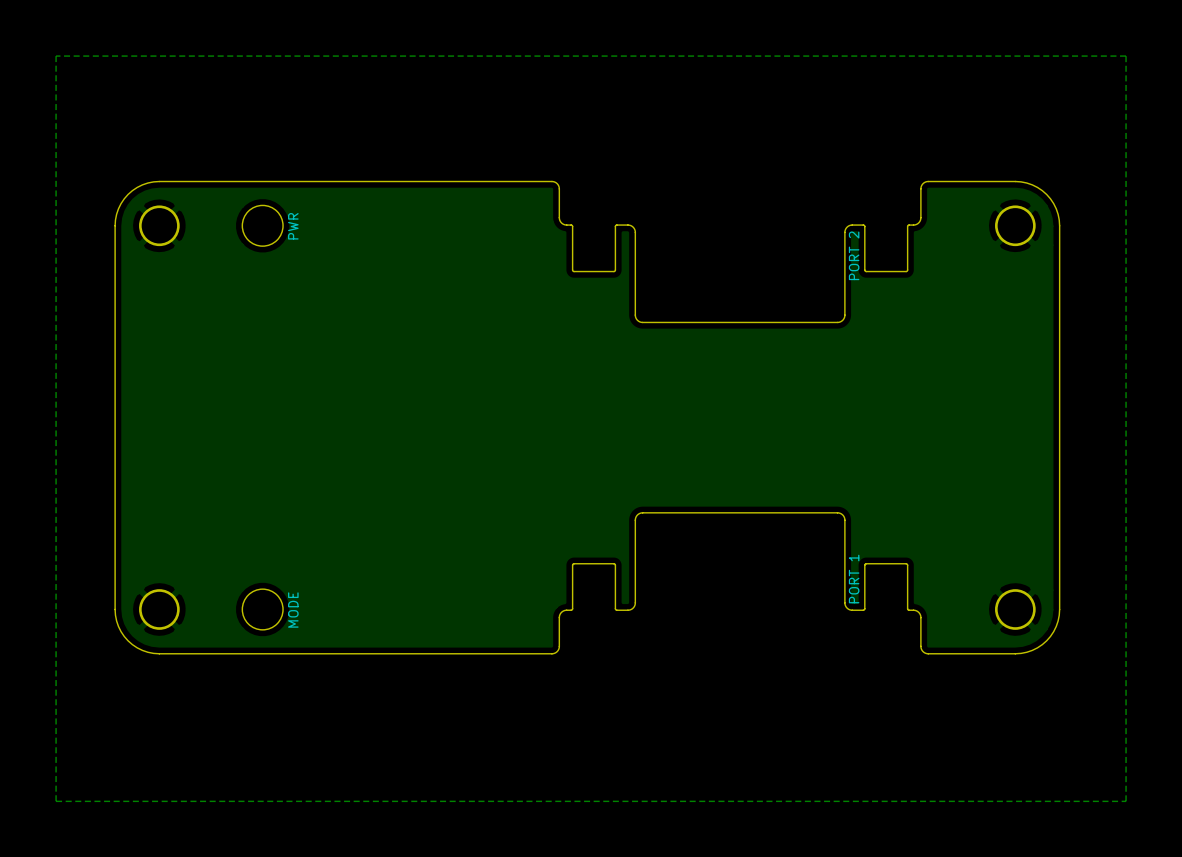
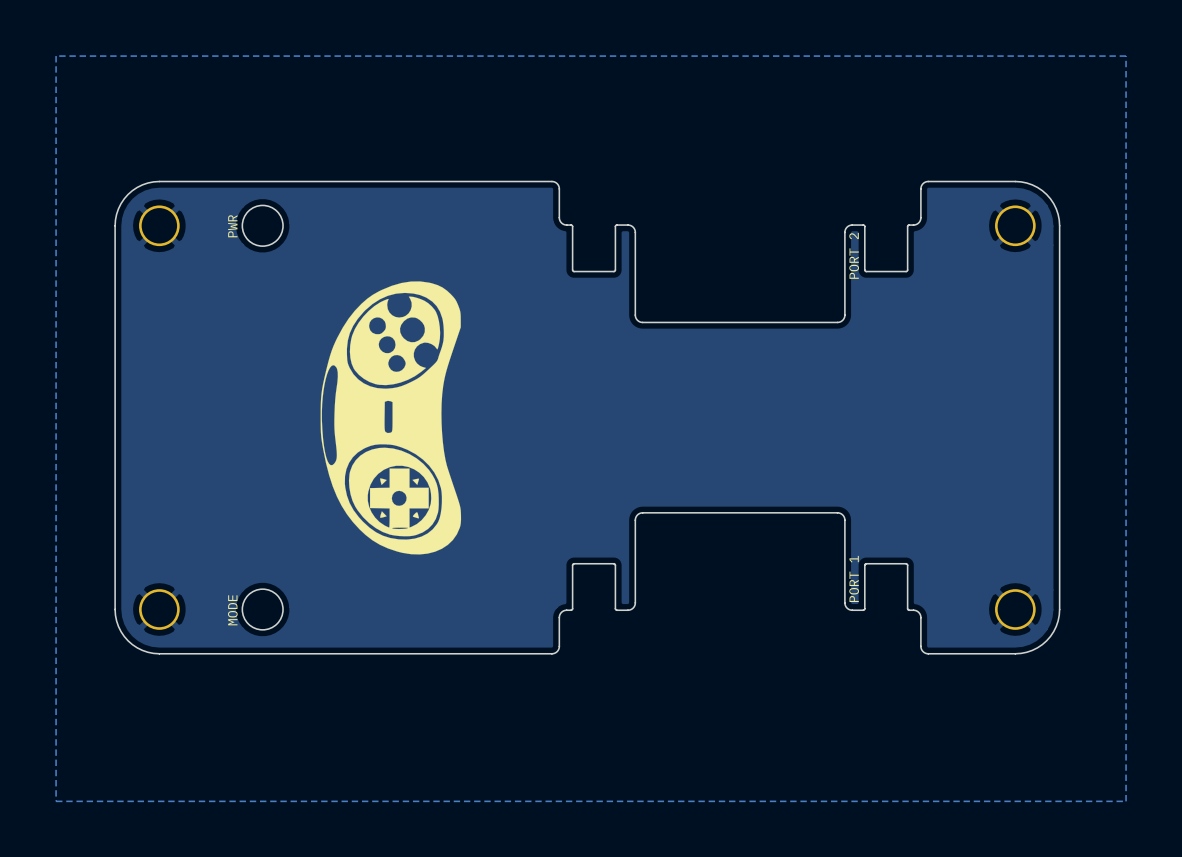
text position: PWR (293, 226) -> PWR (232, 226)
drawing: none -> [320, 281, 462, 555]
text position: MODE (293, 610) -> MODE (232, 610)

